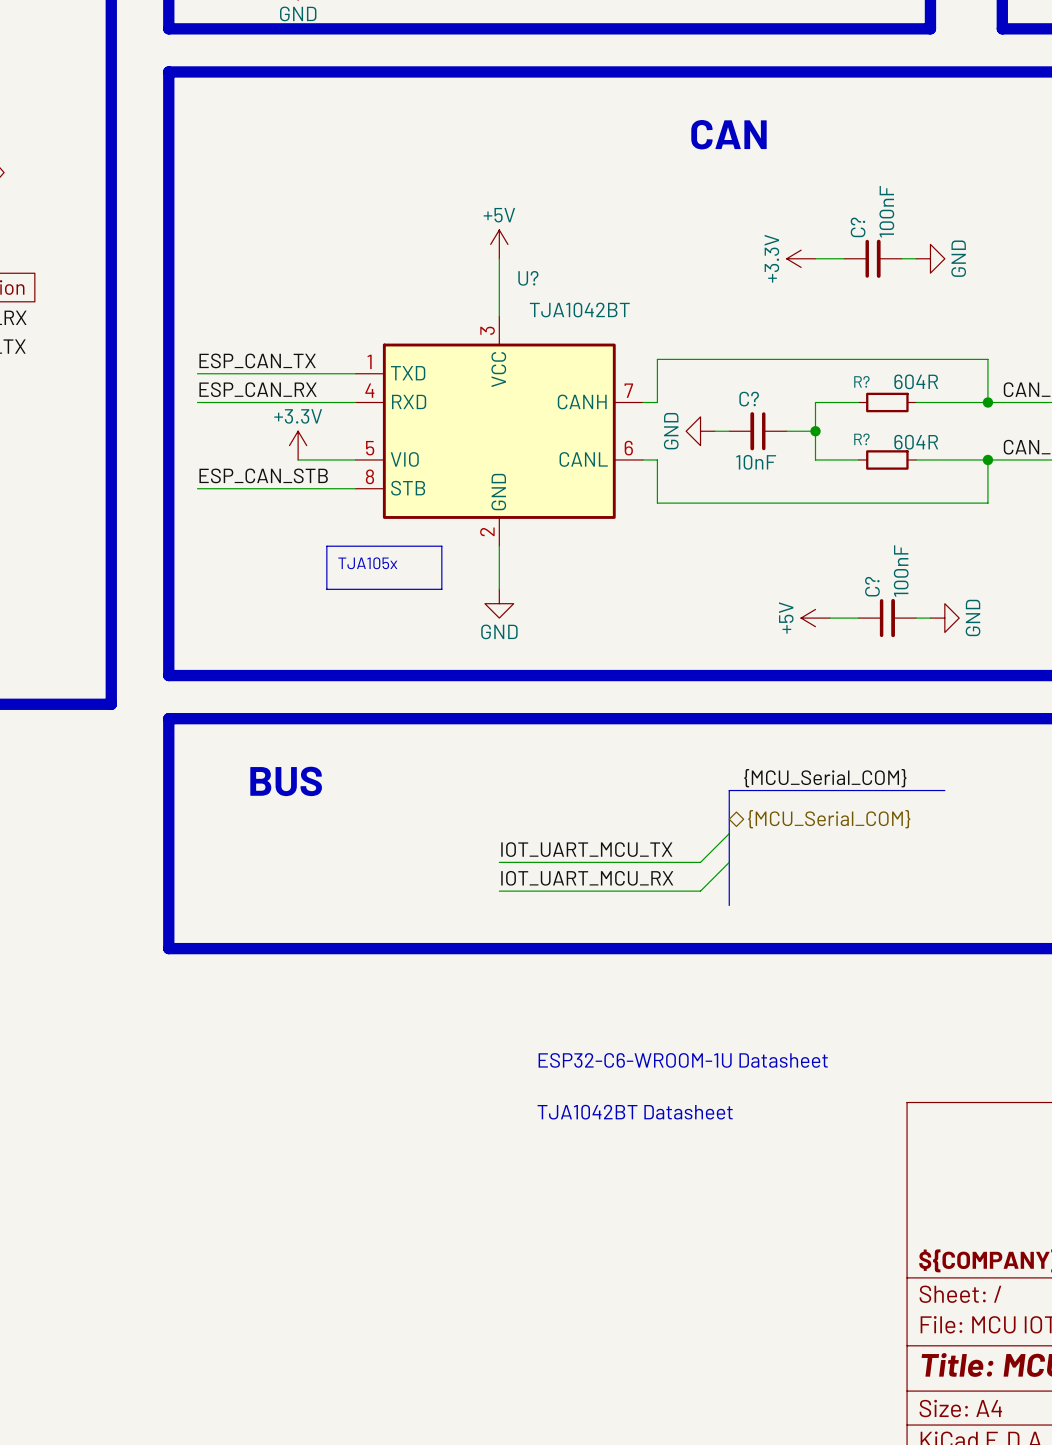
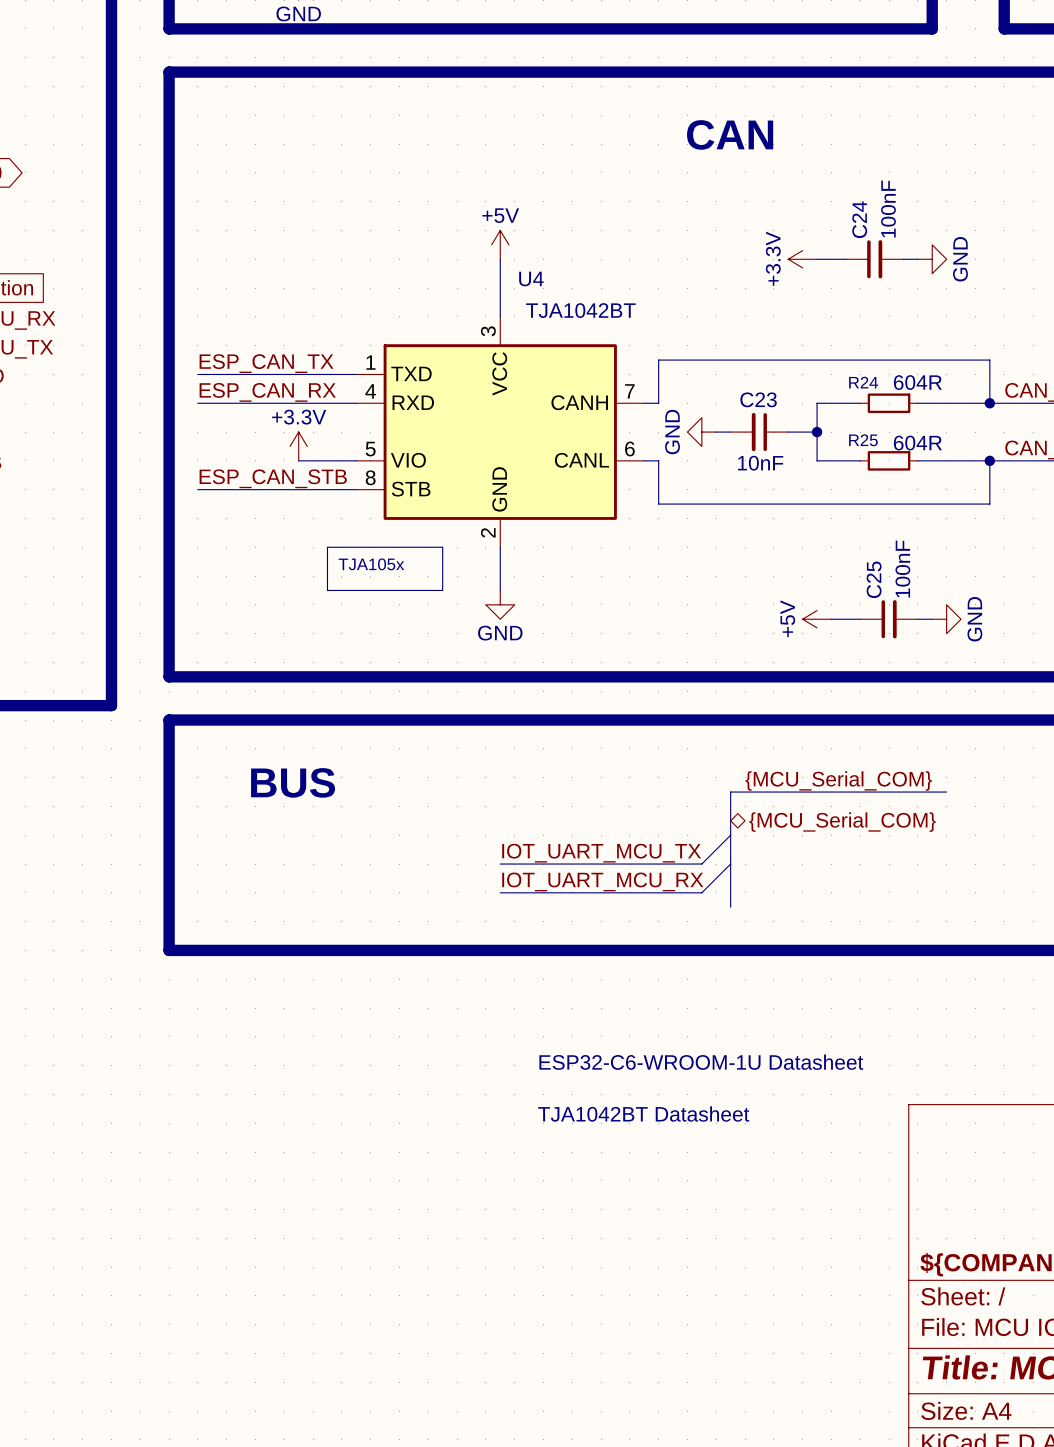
C? name: C? (858, 227) -> C24 (859, 219)
U? name: U? (528, 278) -> U4 (531, 279)
R? name: R? (861, 381) -> R24 (863, 382)
C? name: C? (749, 399) -> C23 (758, 399)
R? name: R? (861, 439) -> R25 (863, 440)
C? name: C? (872, 586) -> C25 (874, 579)

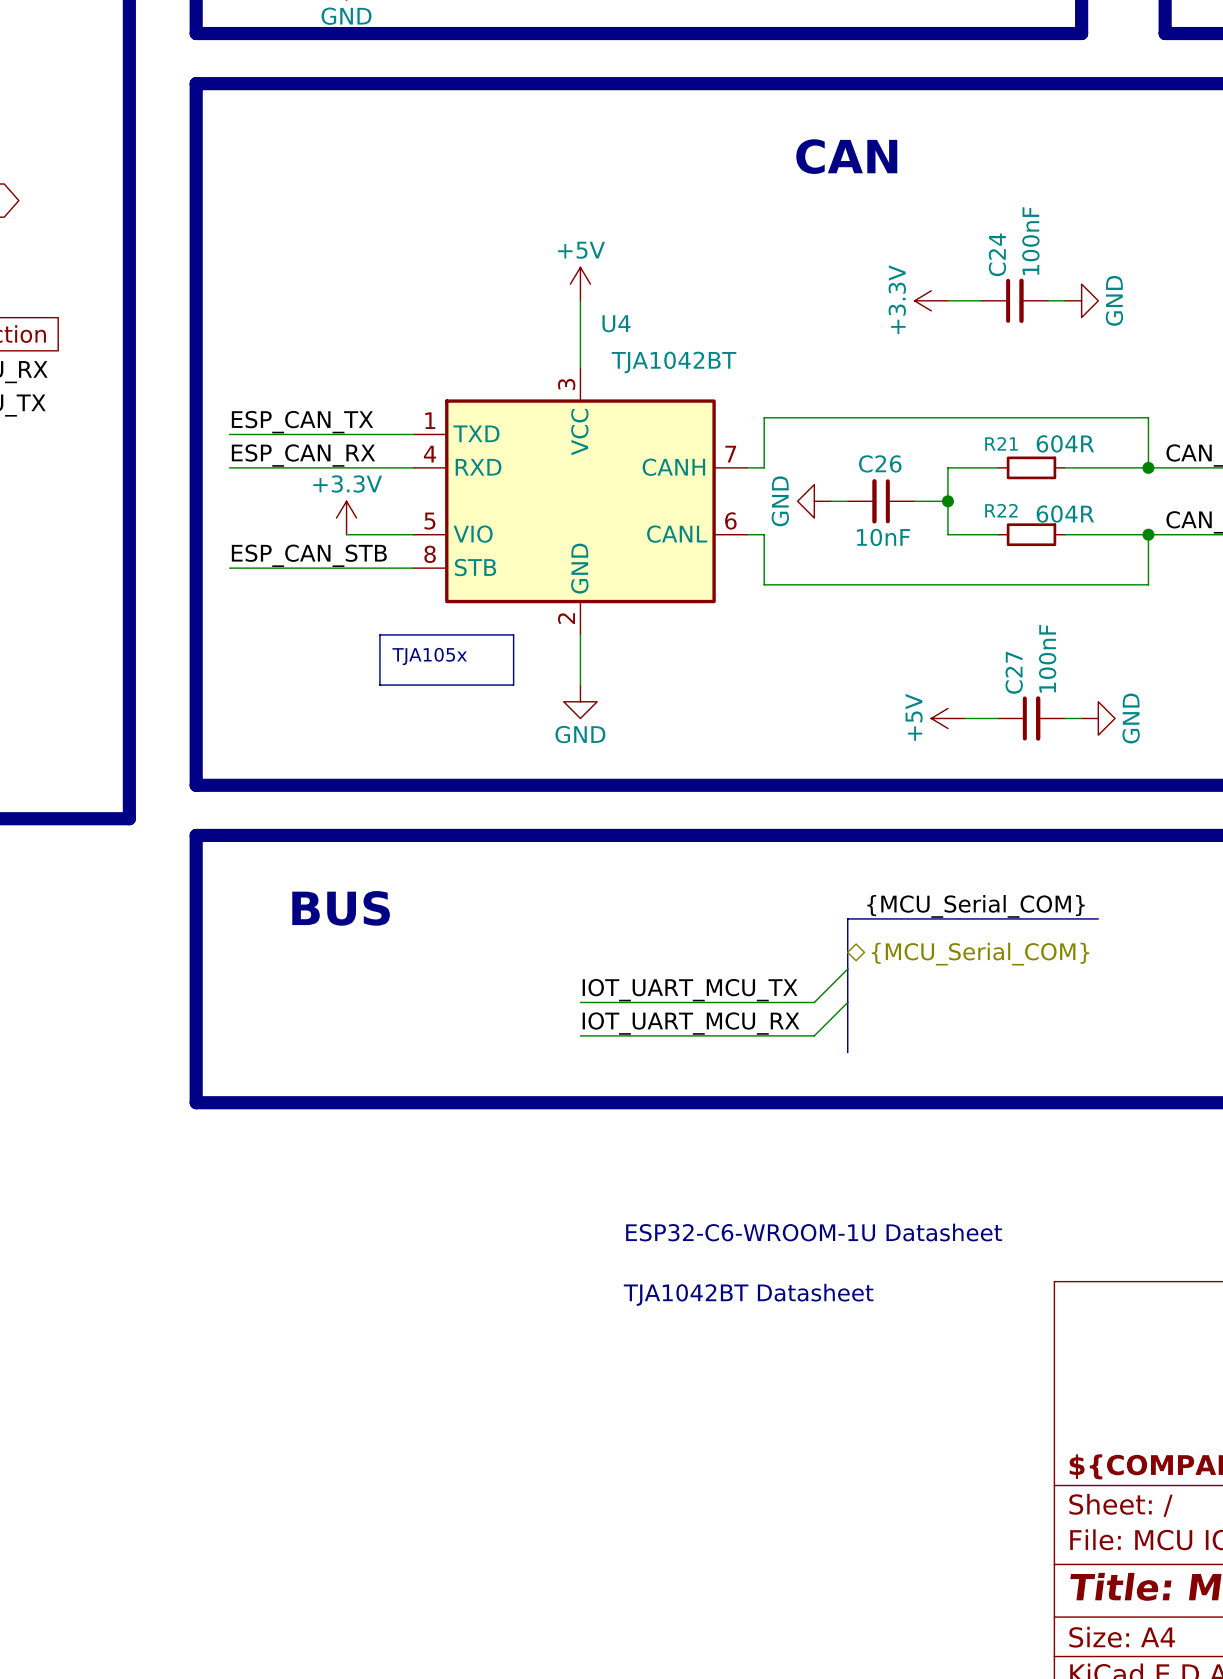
R24 name: R24 (863, 382) -> R21 (1001, 443)
C23 name: C23 (758, 399) -> C26 (880, 463)
R25 name: R25 (863, 440) -> R22 (1001, 510)
C25 name: C25 (874, 579) -> C27 (1014, 672)

